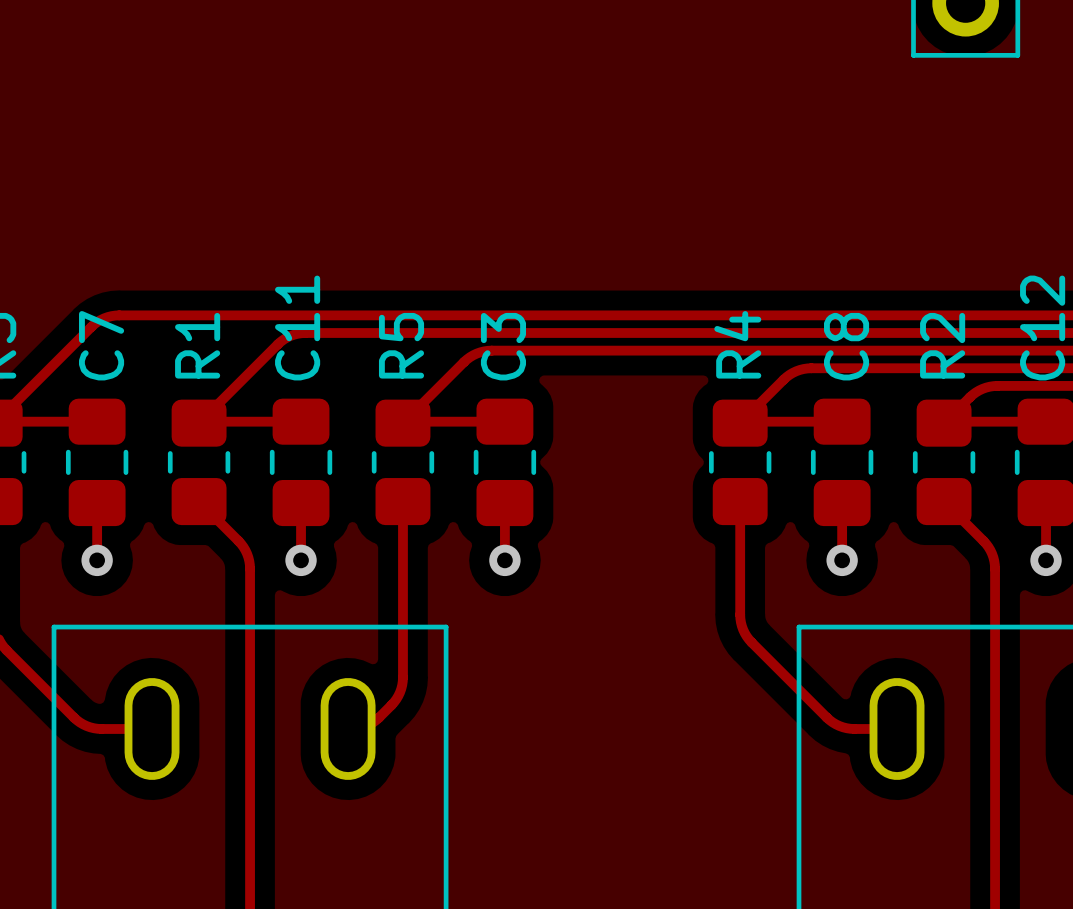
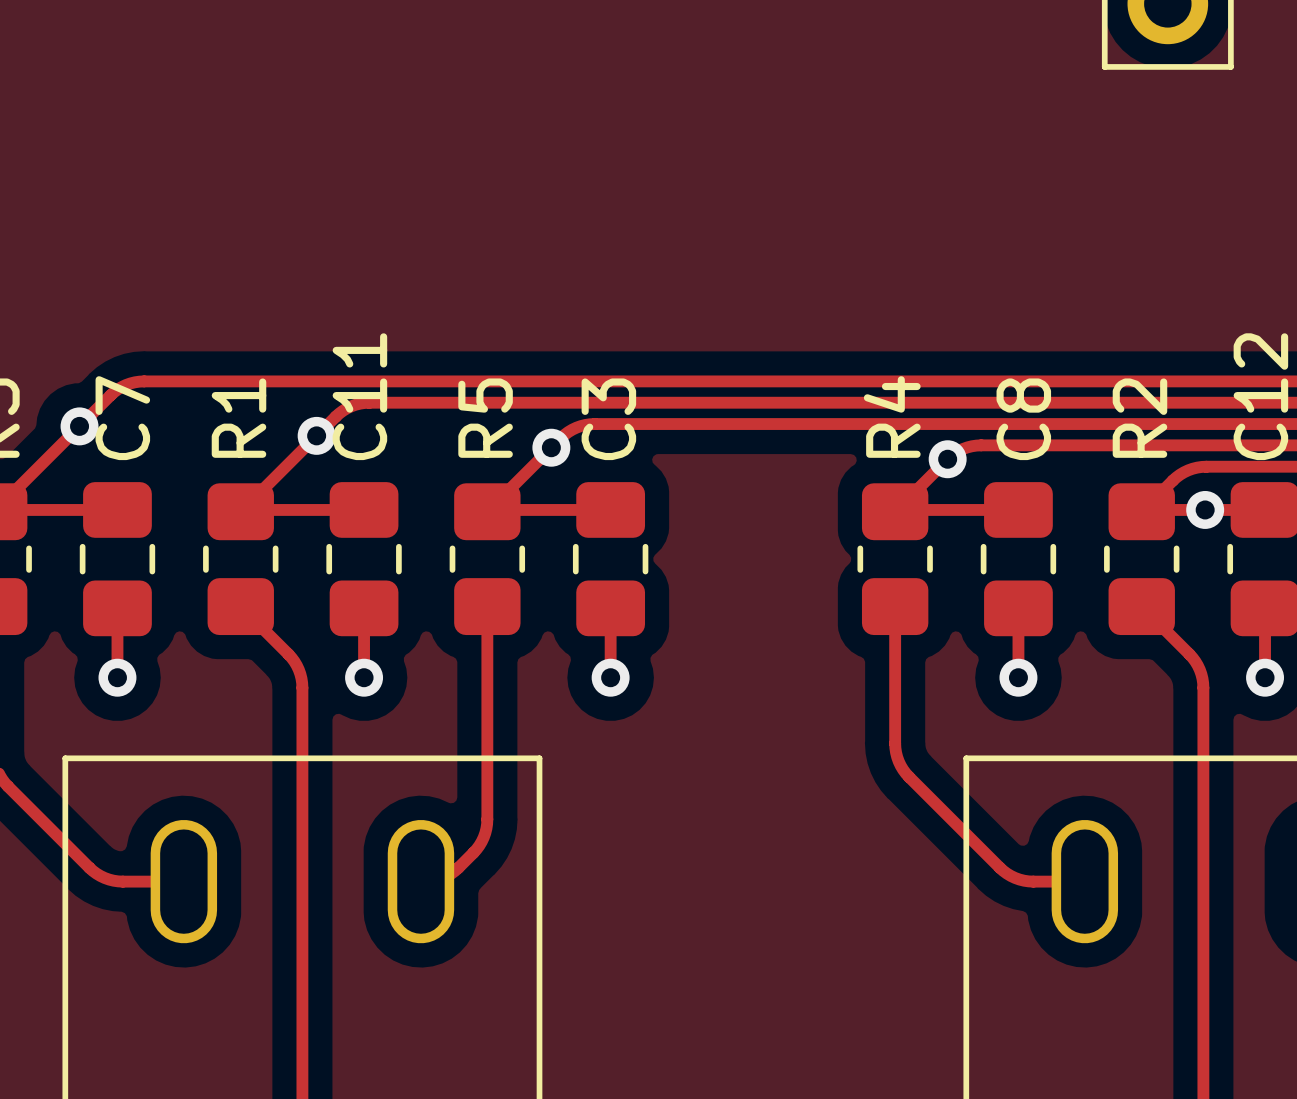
via: none -> (79, 426)
via: none -> (316, 435)
via: none -> (551, 447)
via: none -> (947, 459)
via: none -> (1205, 509)

